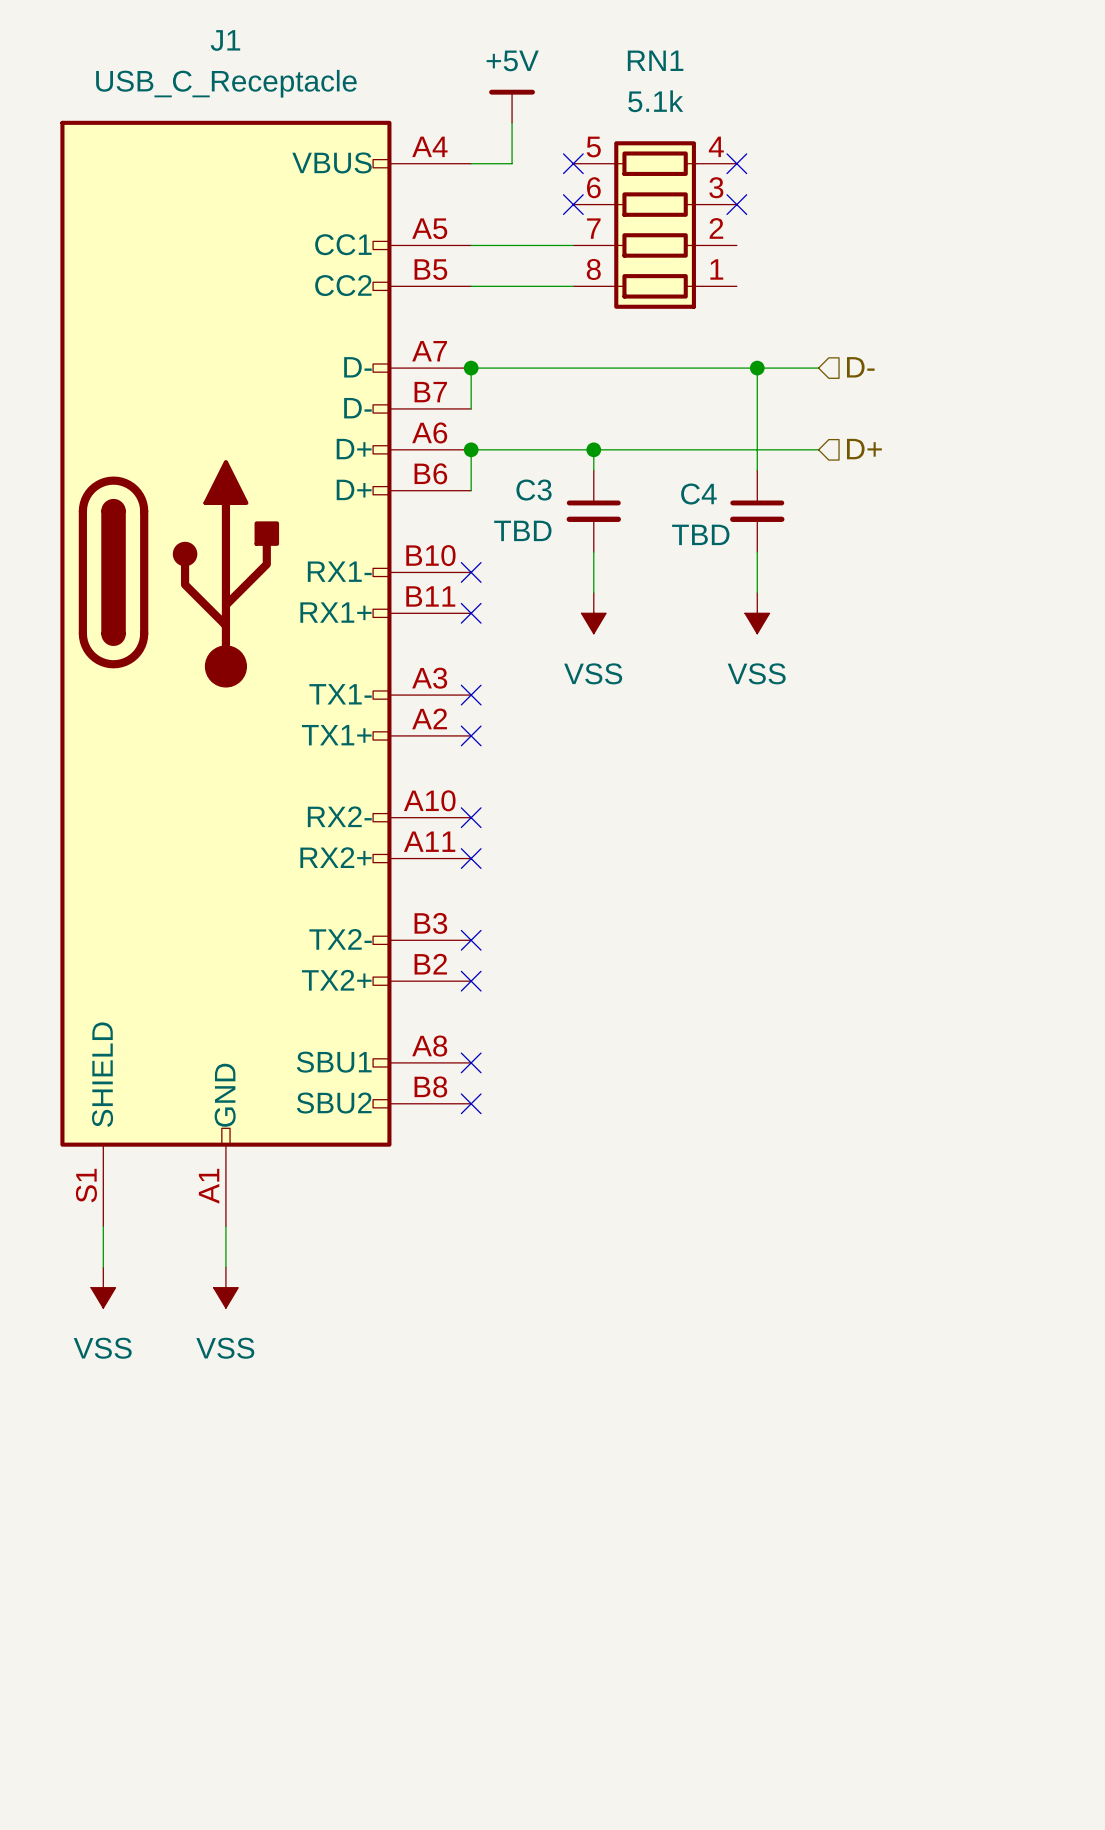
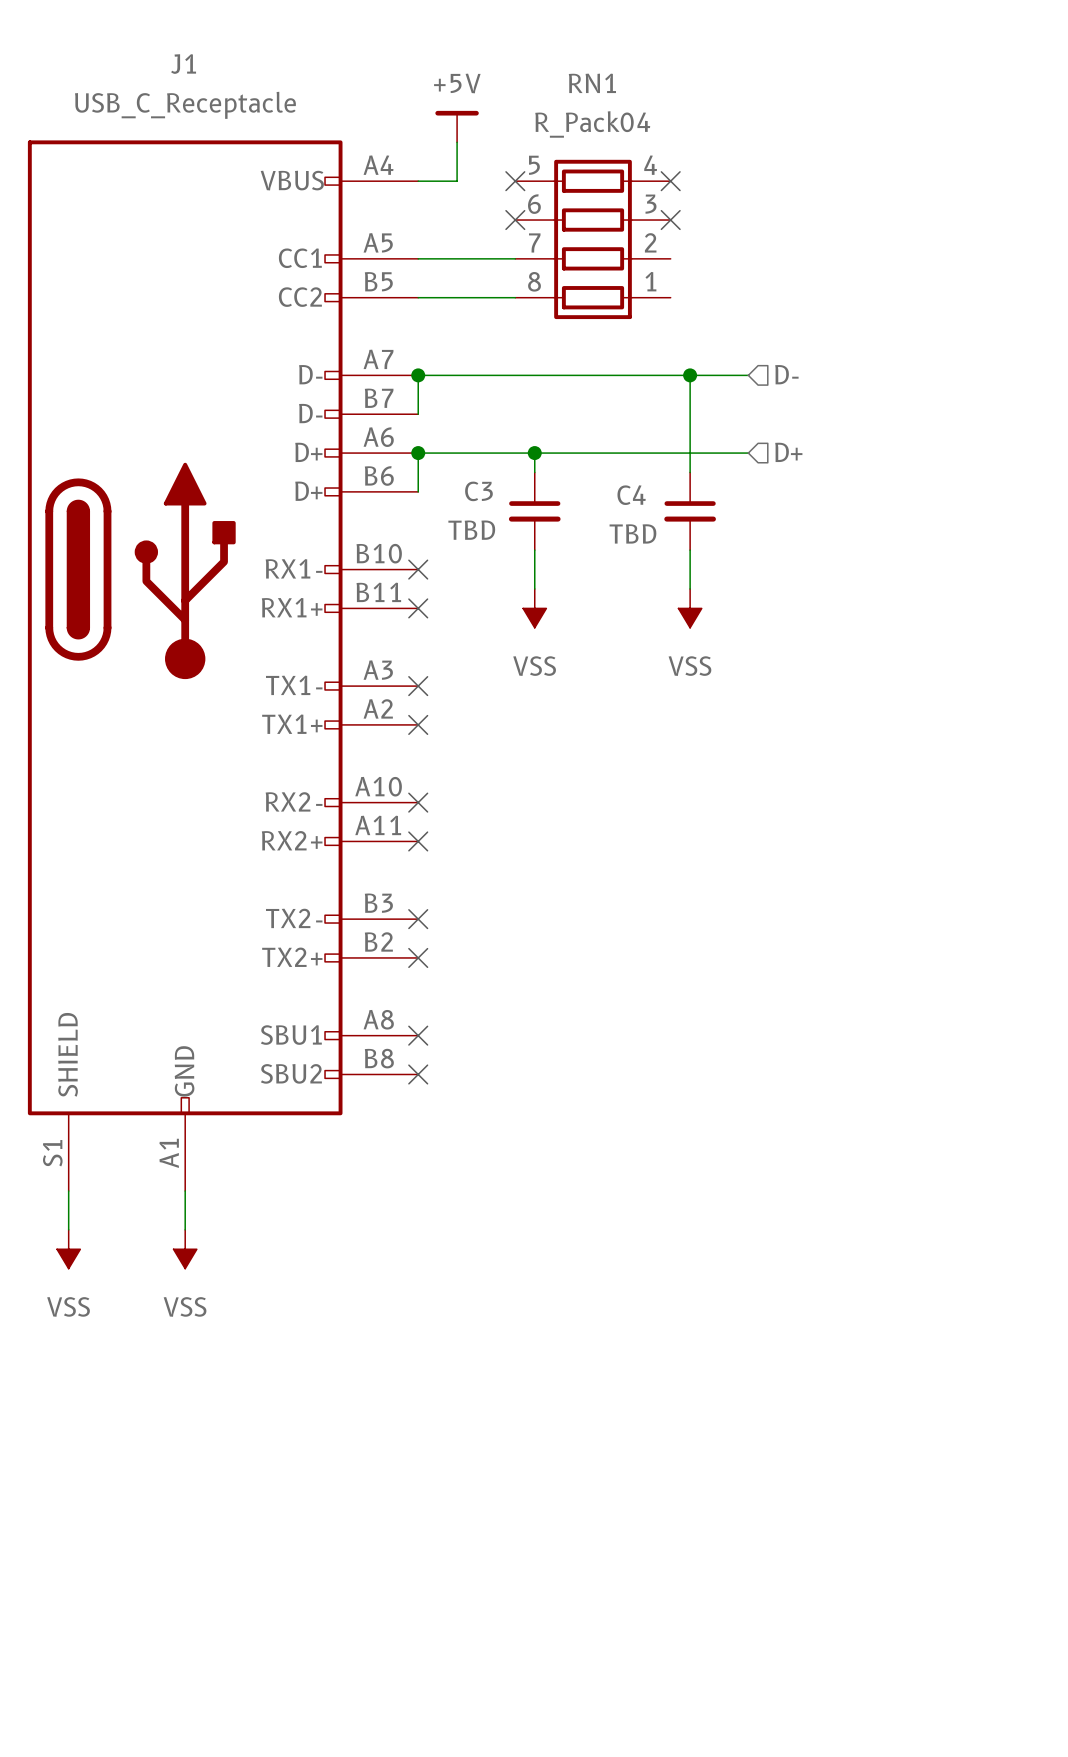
RN1 value: 5.1k (655, 101) -> R_Pack04 (592, 124)

